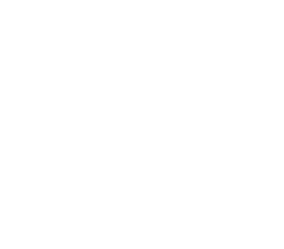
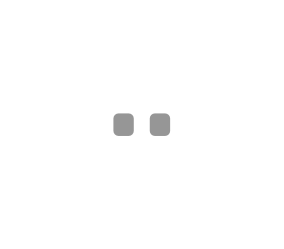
part: none -> (141, 124)

